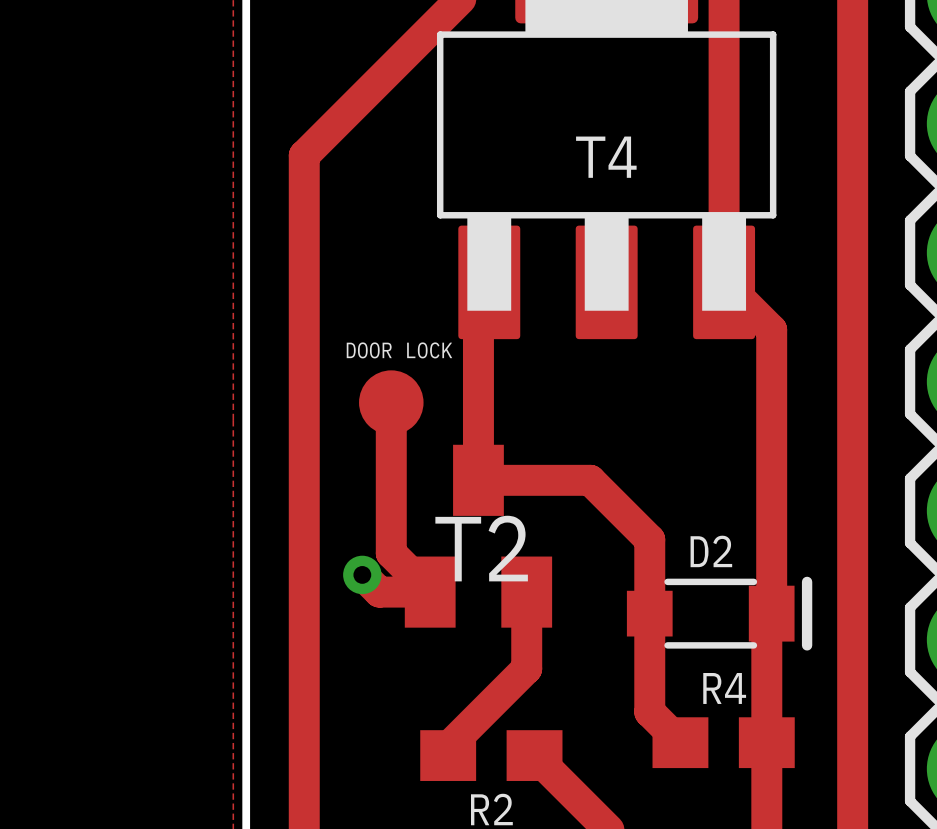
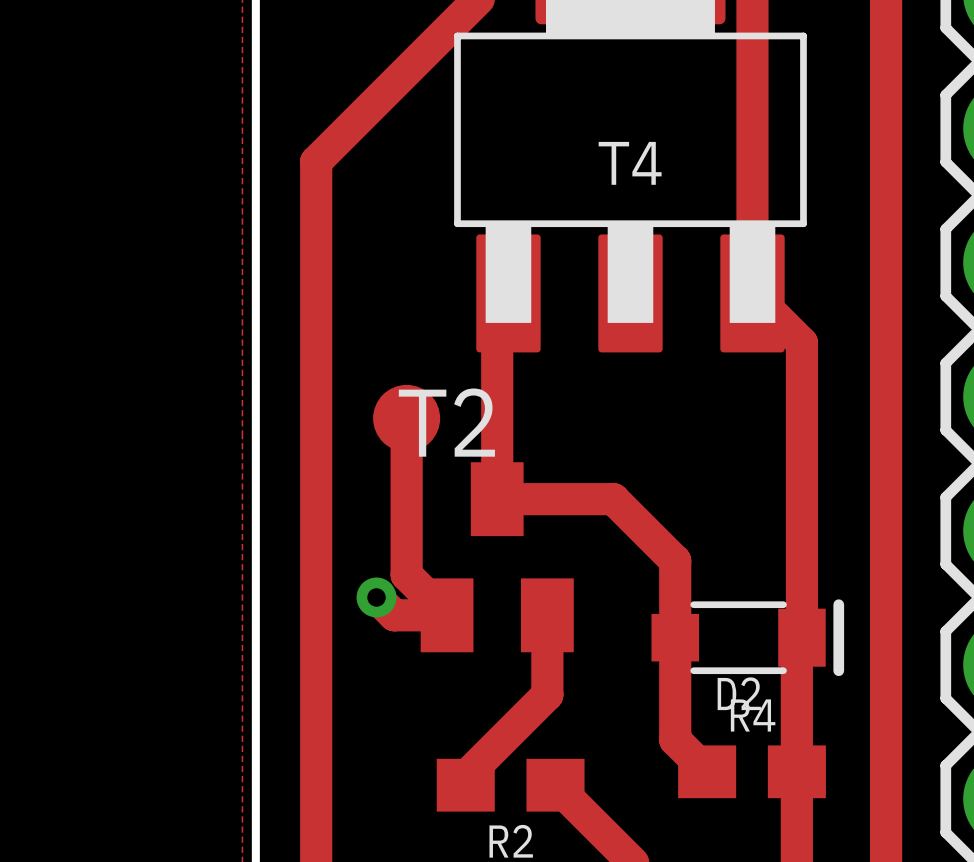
text: DOOR LOCK (399, 350) -> none
T2 name position: T2 (481, 548) -> T2 (446, 422)
D2 name position: D2 (711, 551) -> D2 (739, 693)

